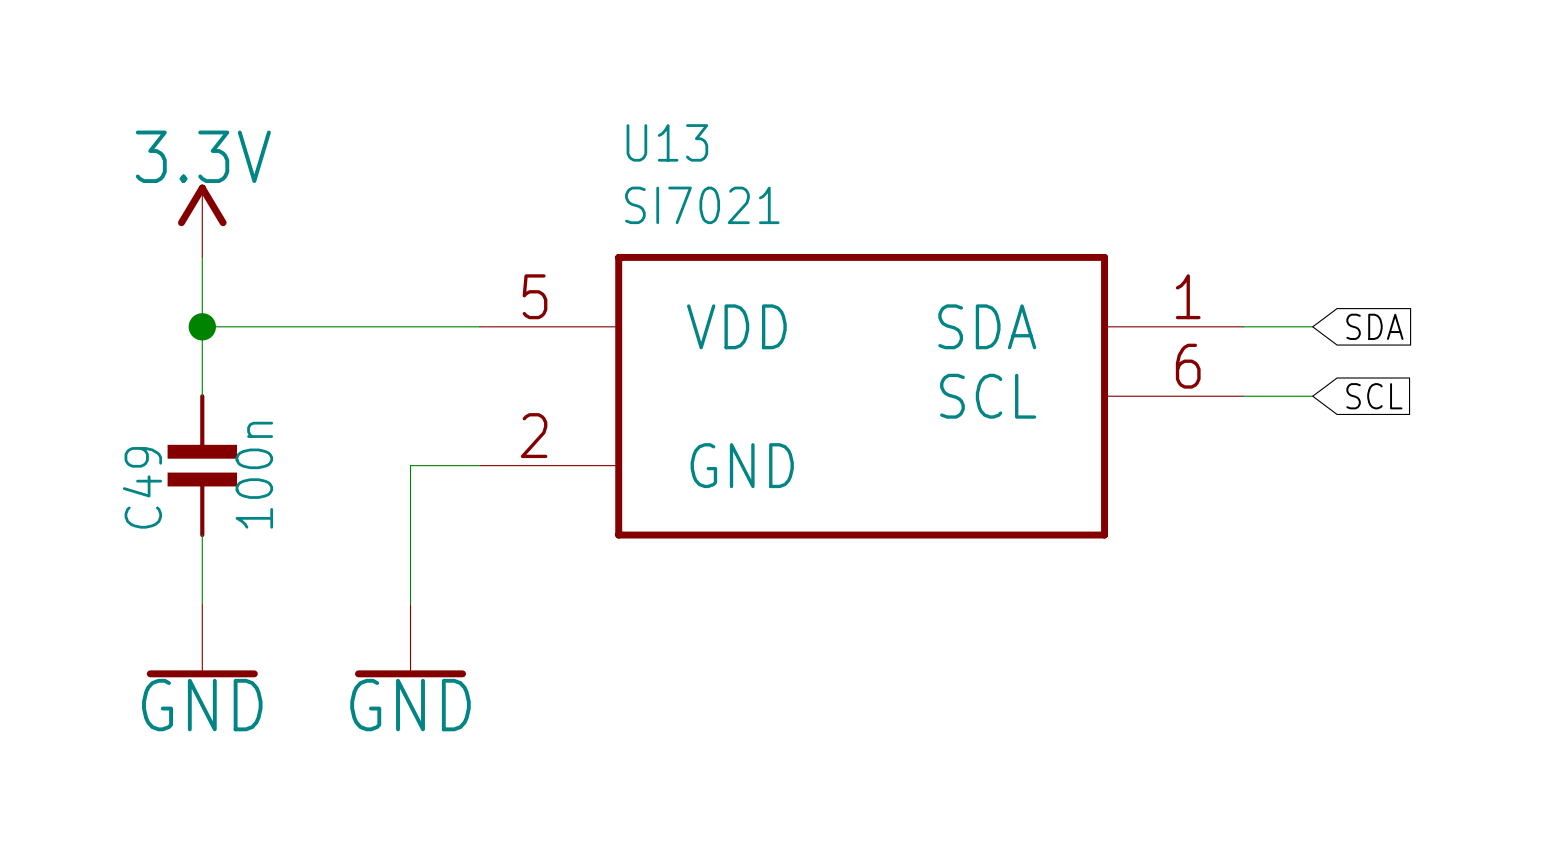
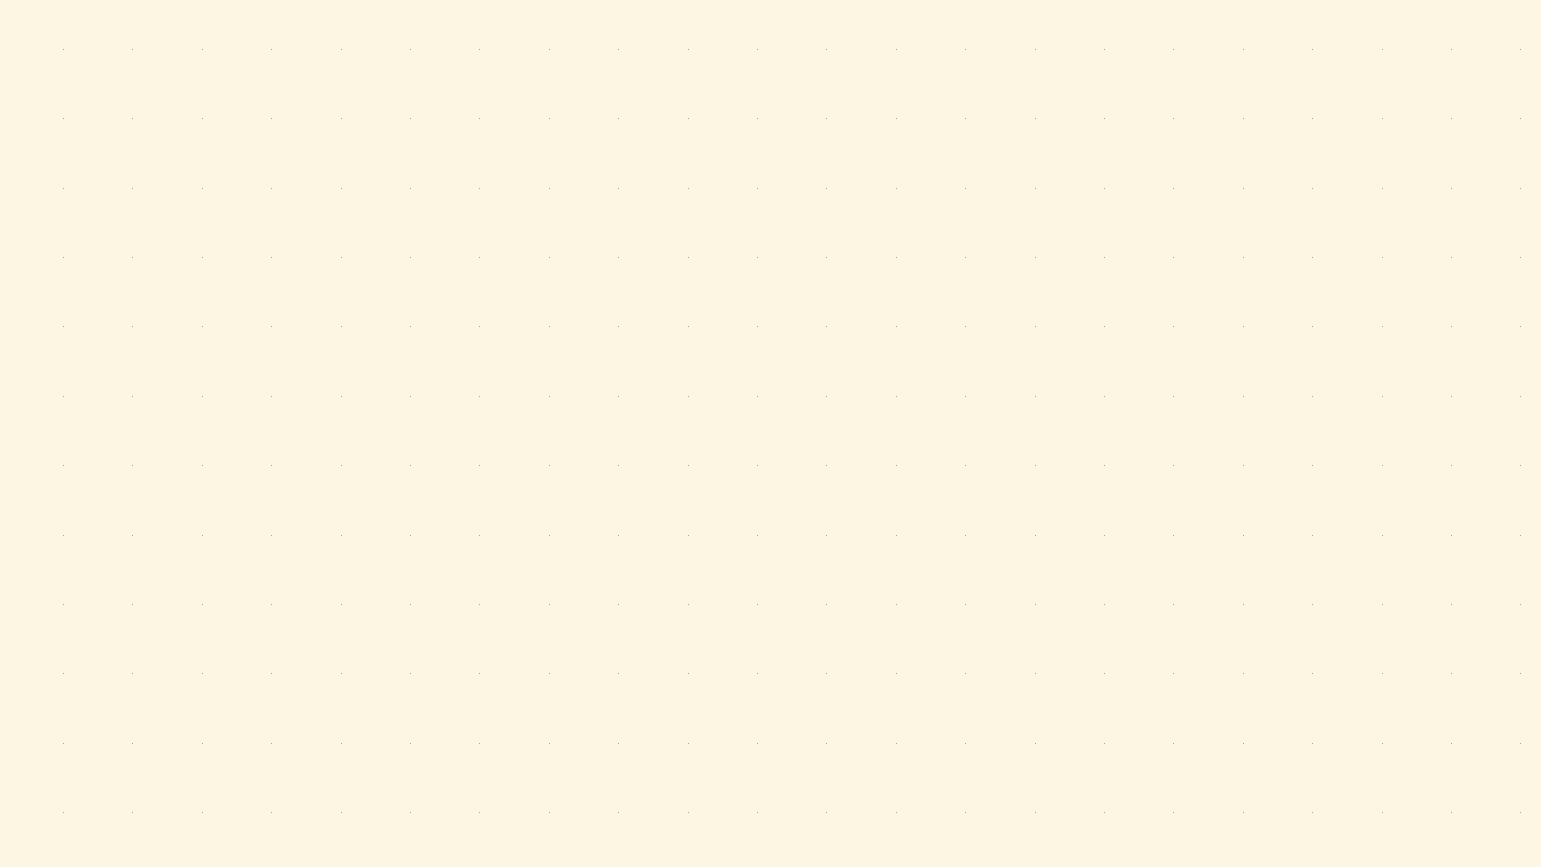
power symbol: 3.3V (202, 220) -> none
wire: (202, 257) (202, 396) -> none
wire: (202, 326) (479, 326) -> none
junction: (202, 326) -> none
wire: (1243, 326) (1312, 326) -> none
global label: SDA (1374, 326) -> none
U13: SI7021 (861, 396) -> none
wire: (1243, 396) (1312, 396) -> none
global label: SCL (1374, 396) -> none
C49: 100n (202, 465) -> none
wire: (479, 465) (410, 465) (410, 604) -> none
wire: (202, 535) (202, 604) -> none
power symbol: GND (202, 640) -> none
power symbol: GND (410, 640) -> none

